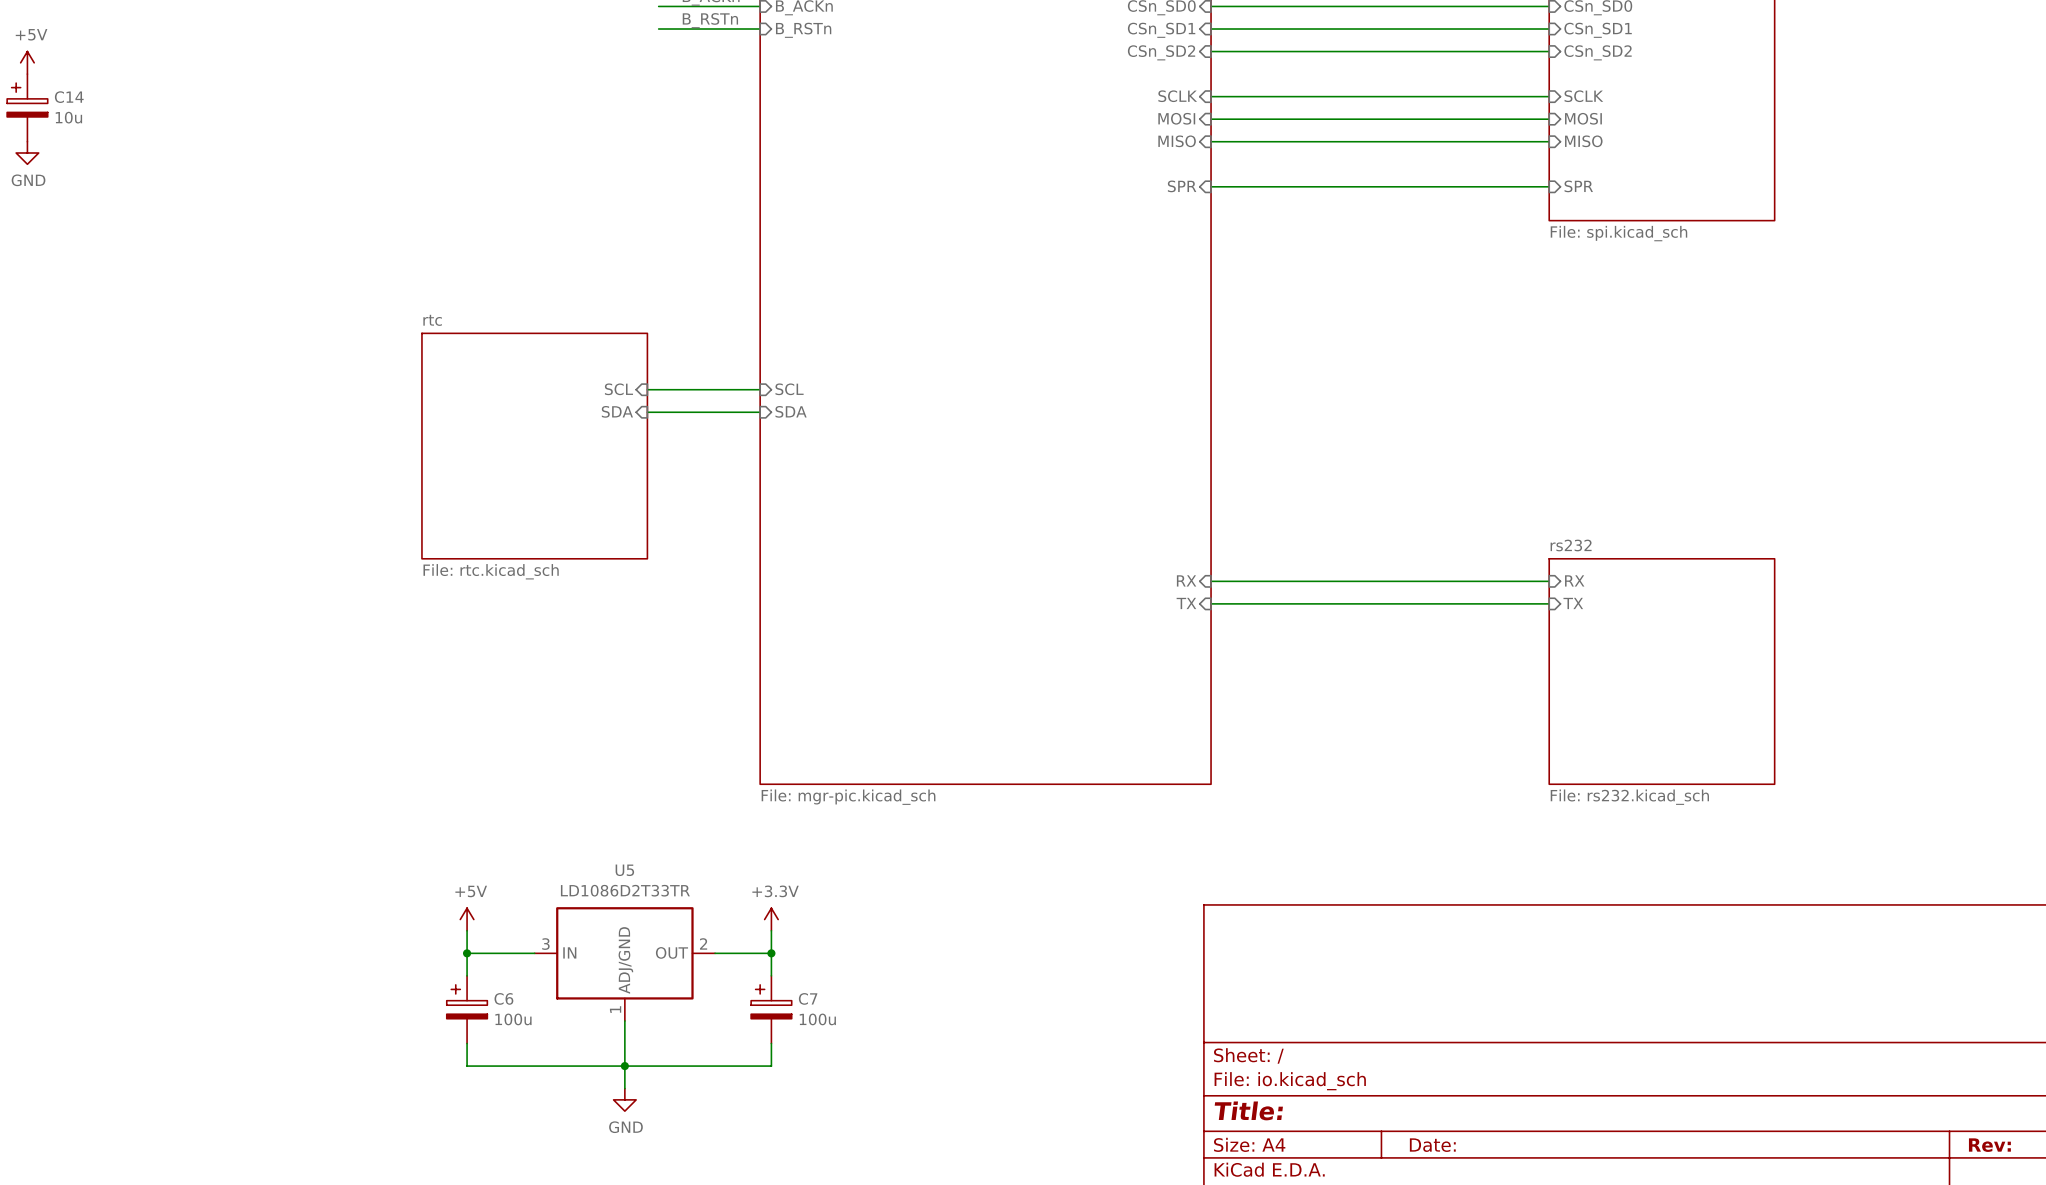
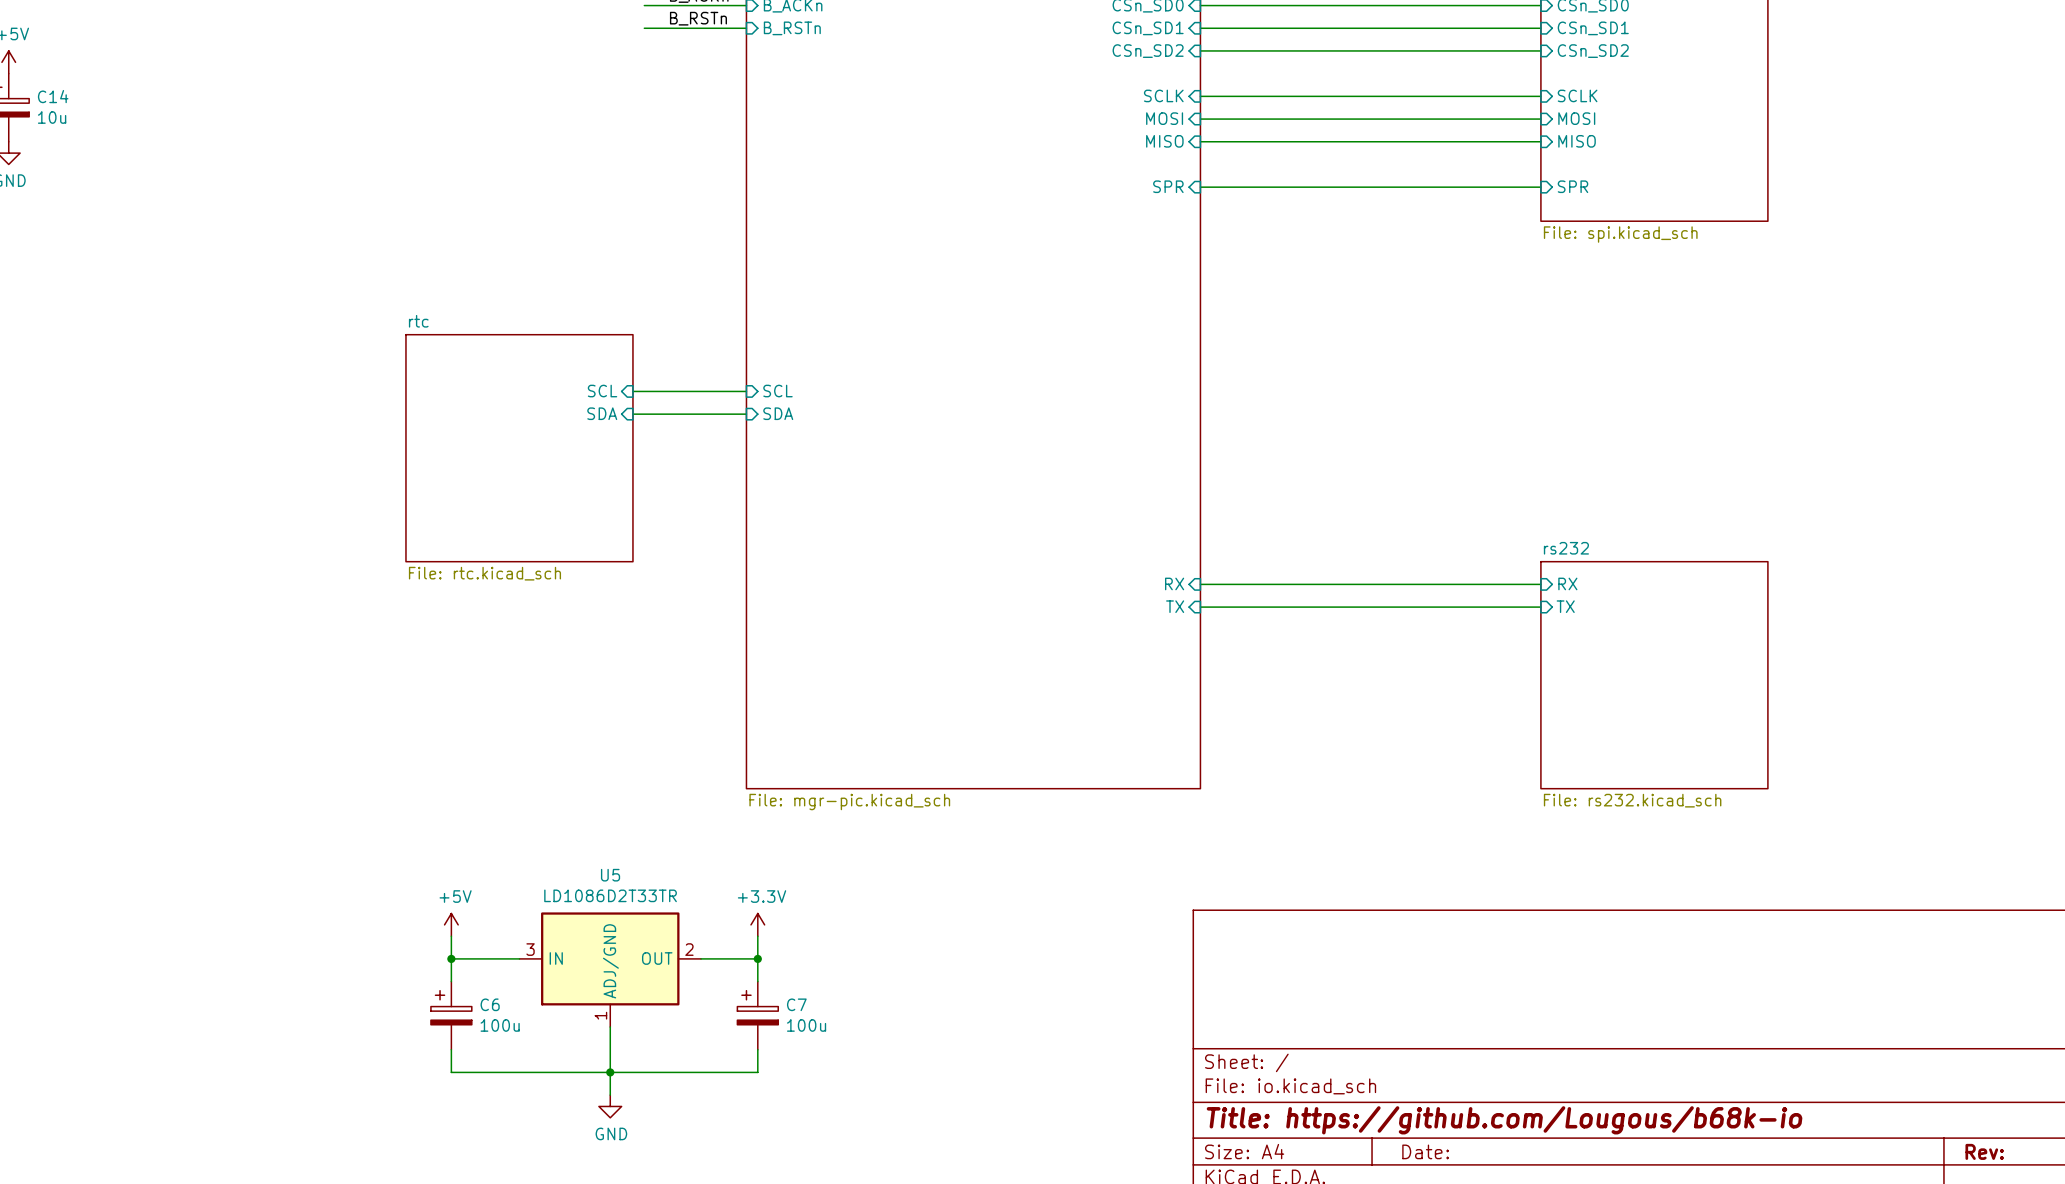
title block: Title: (1248, 1110) -> Title: https://github.com/Lougous/b68k-io (1504, 1120)

